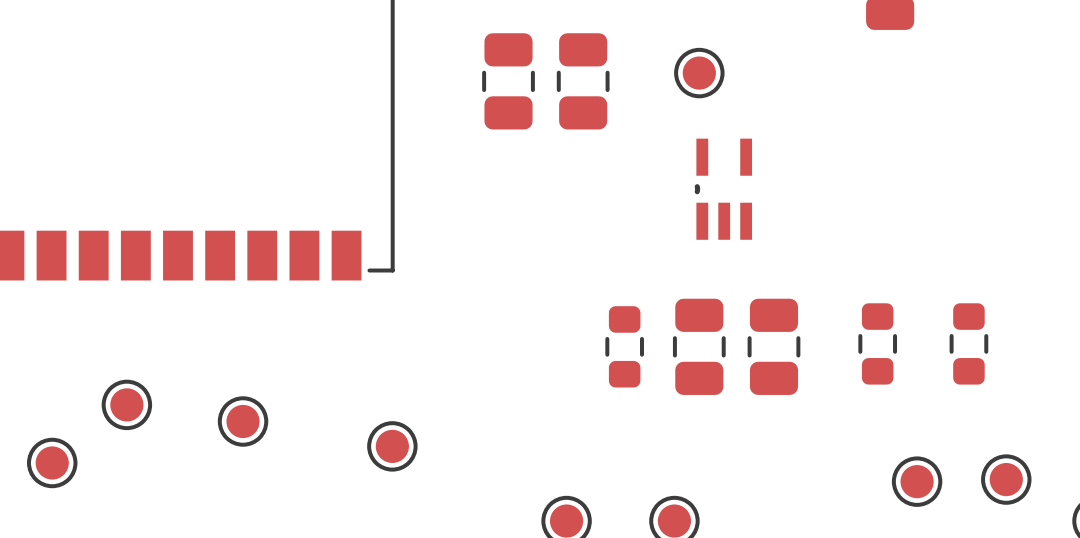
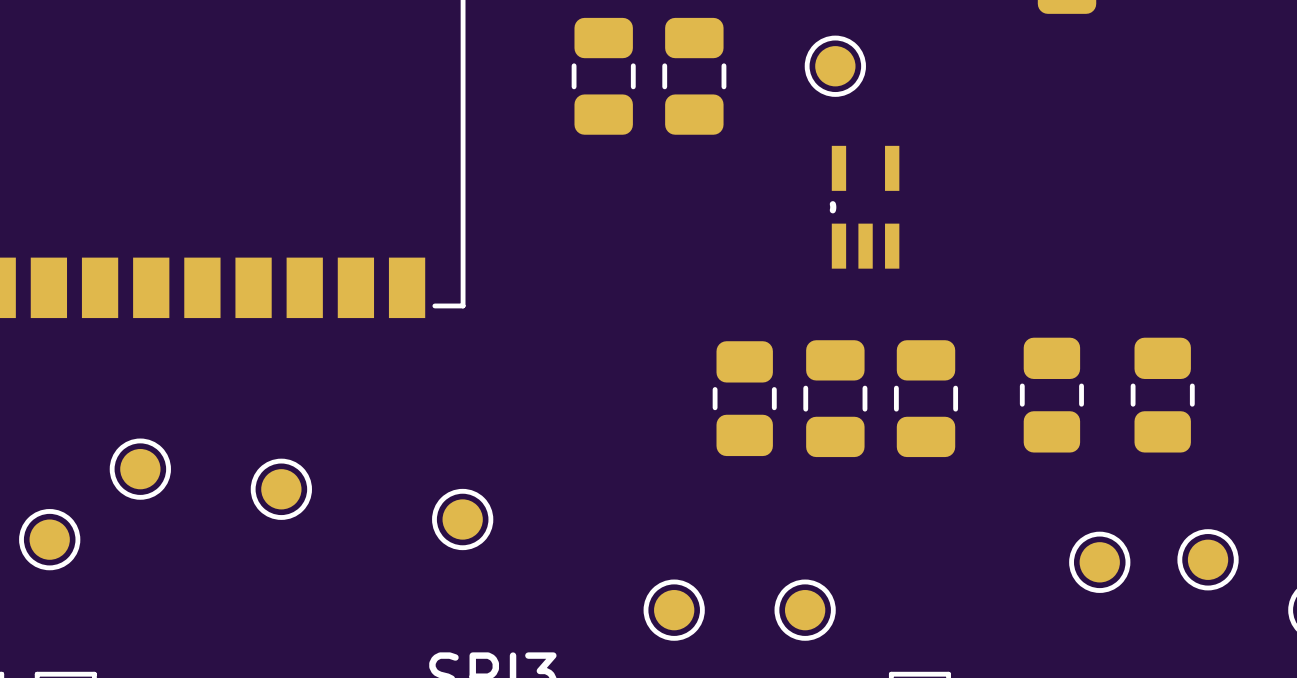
part footprint: [858, 303, 898, 385] -> [1019, 337, 1084, 453]
part footprint: [949, 303, 989, 385] -> [1130, 337, 1195, 453]
part footprint: [605, 306, 644, 388] -> [712, 341, 777, 457]

